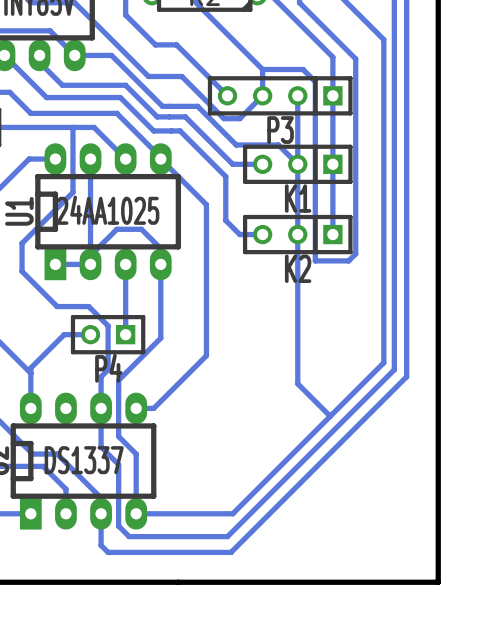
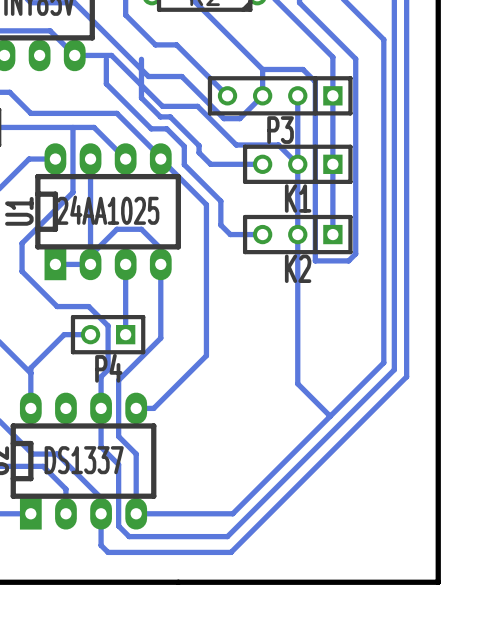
bottom track: (4, 55) (46, 97) (120, 97) (153, 130) (180, 130) (225, 176) (225, 220) (239, 234) -> (106, 59) (106, 83) (151, 128) (166, 128) (184, 146) (184, 164) (220, 201) (220, 225) (230, 234) (239, 234)
bottom track: (39, 55) (39, 62) (62, 85) (125, 85) (157, 116) (160, 116) -> (141, 59) (141, 97) (160, 116)
bottom track: (170, 116) (185, 116) (232, 164) -> (170, 116) (199, 145) (199, 152) (210, 164) (232, 164)

